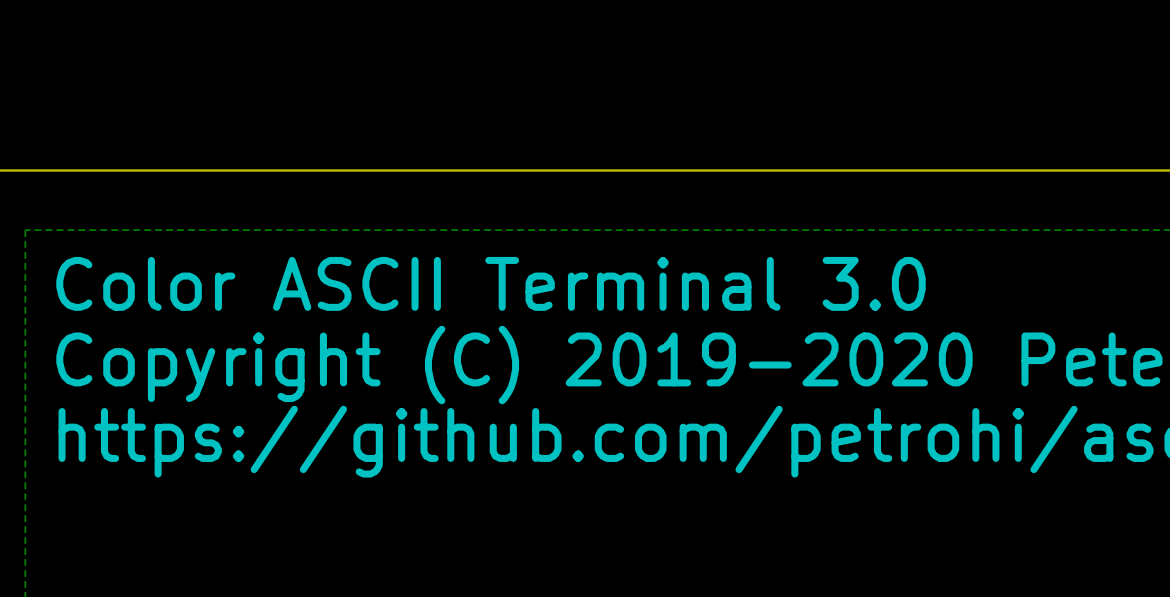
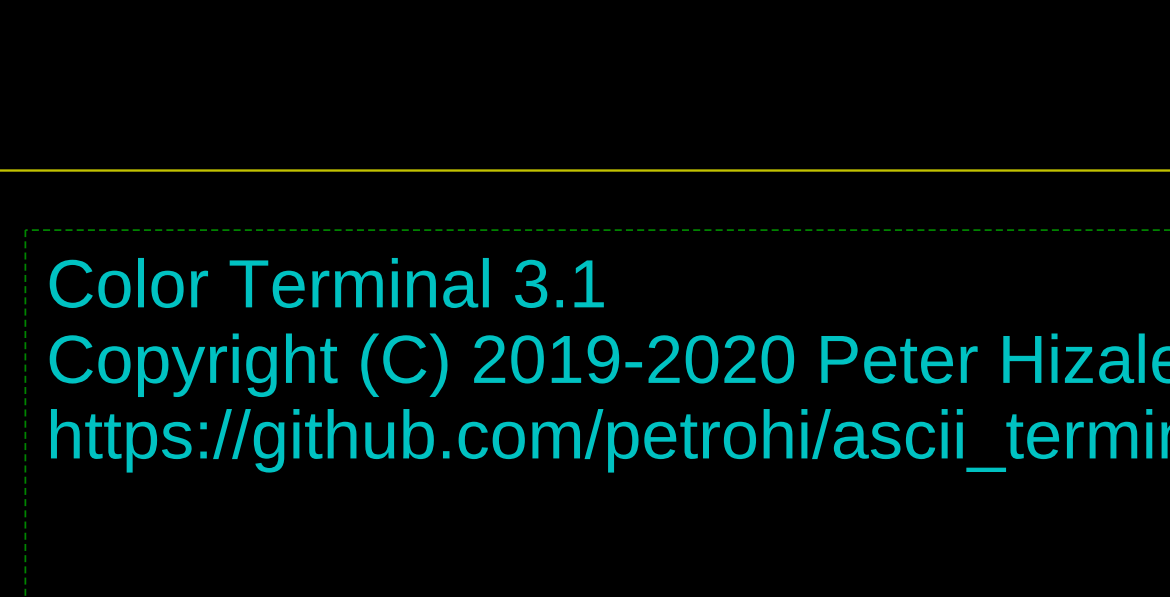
text: Color ASCII Terminal 3.0 (491, 283) -> Color Terminal 3.1 (326, 282)

